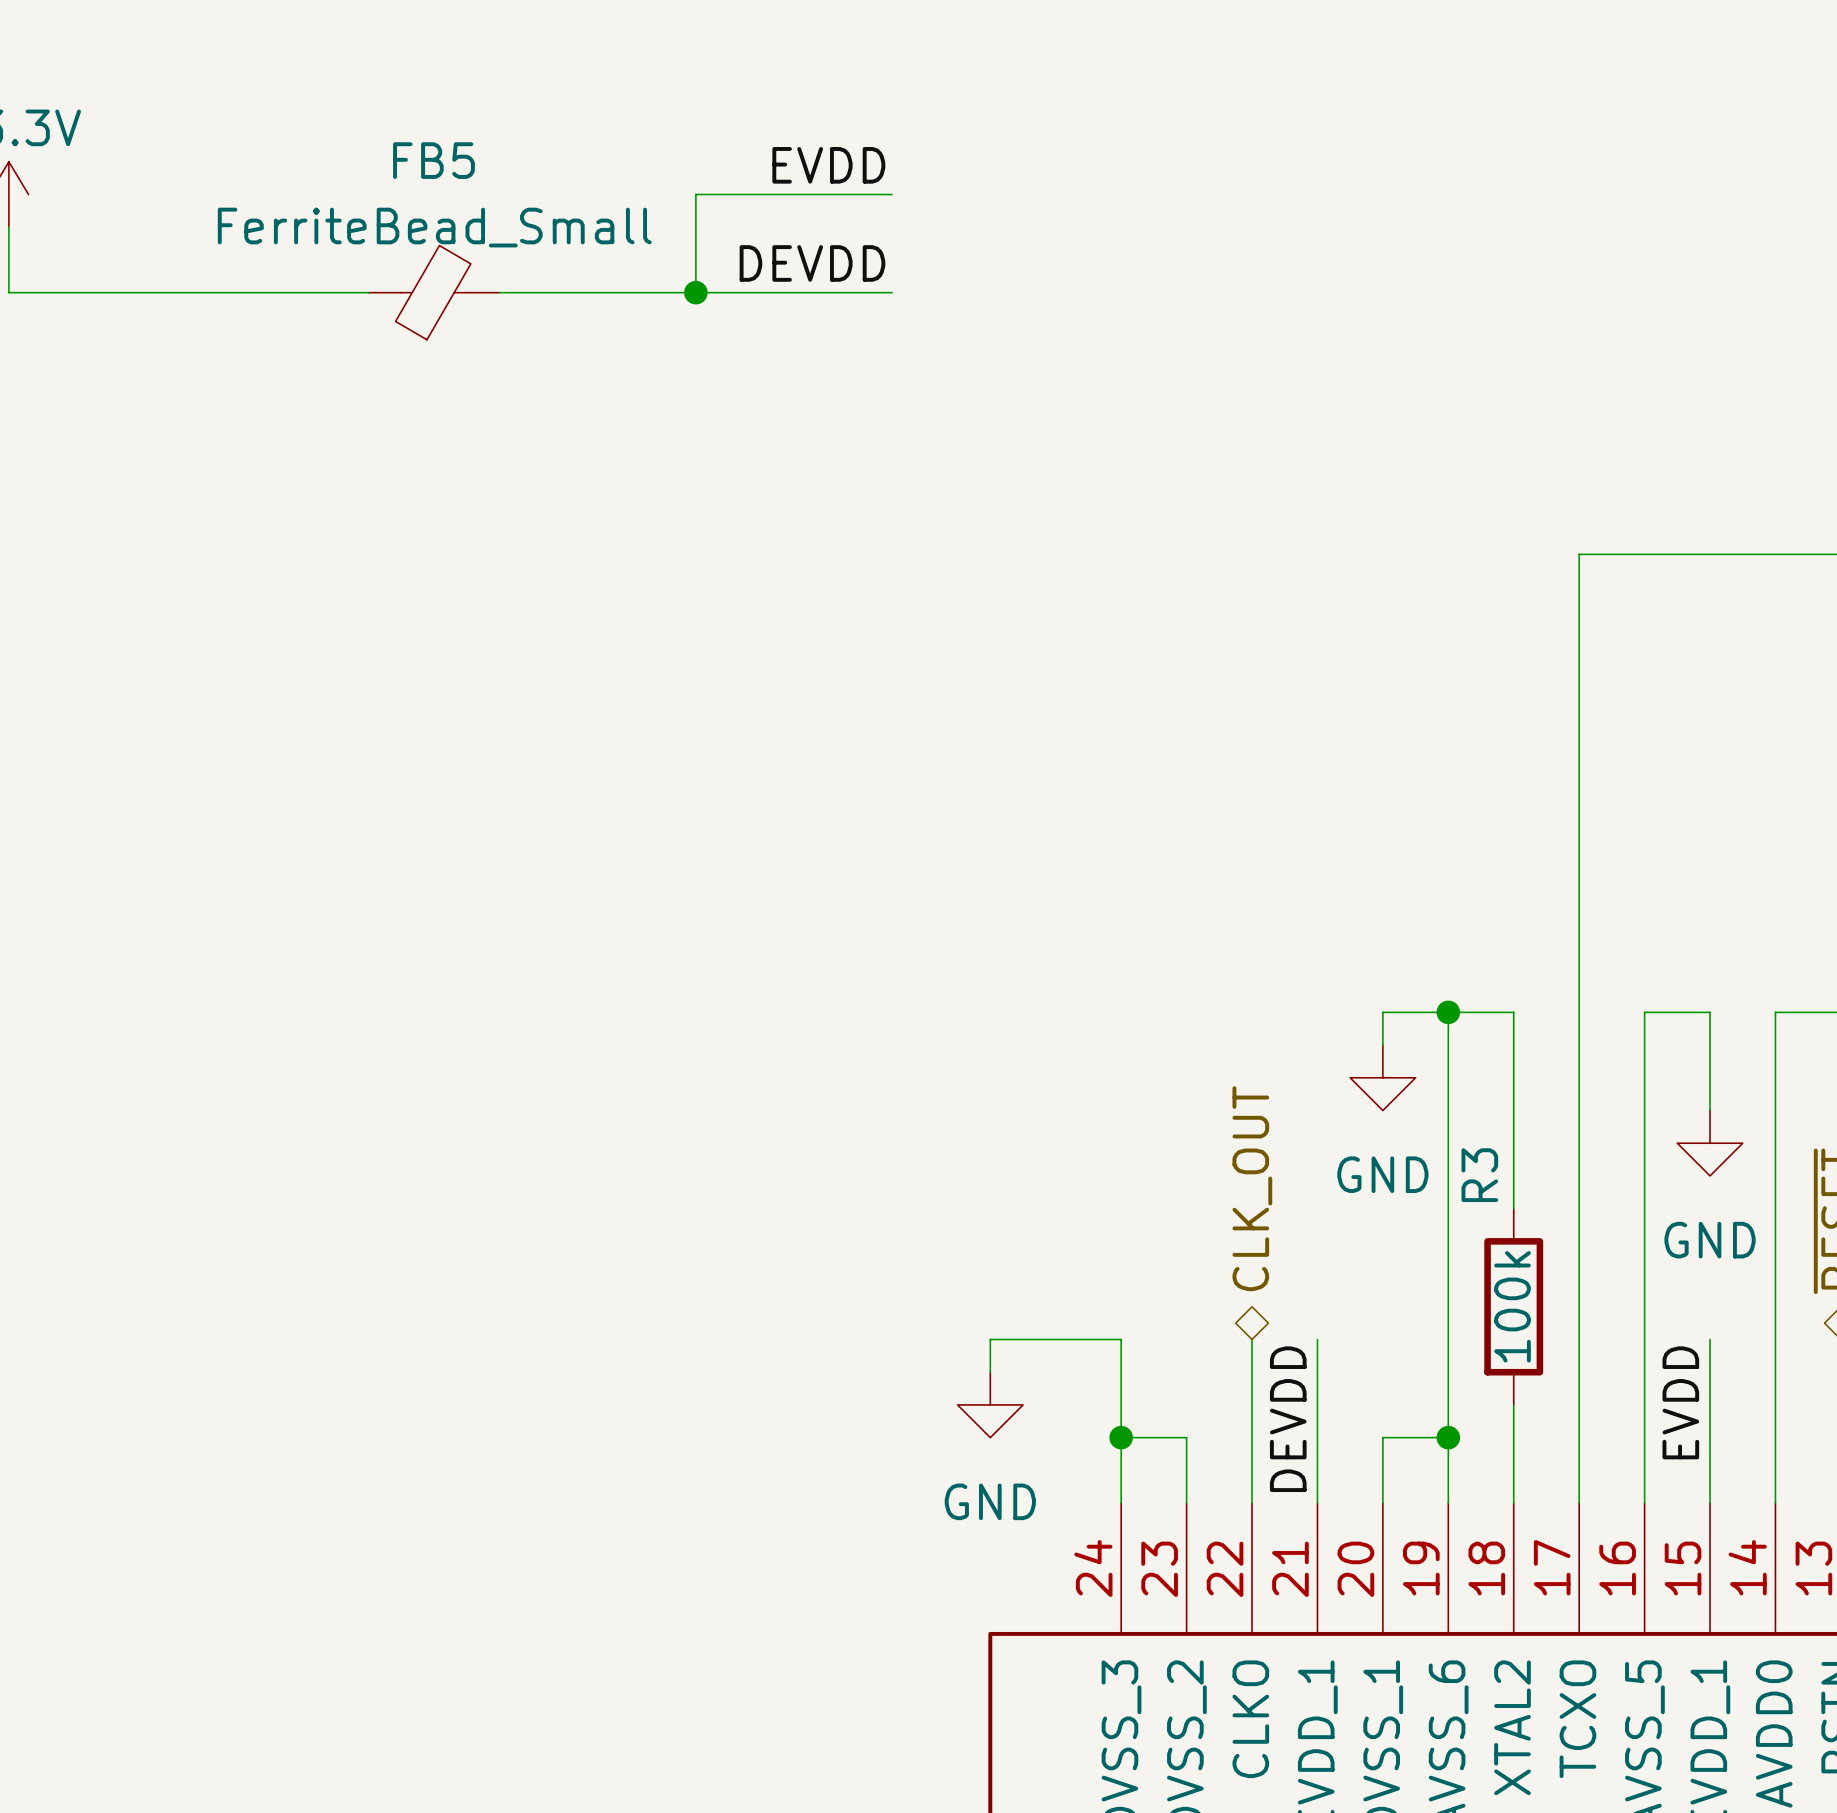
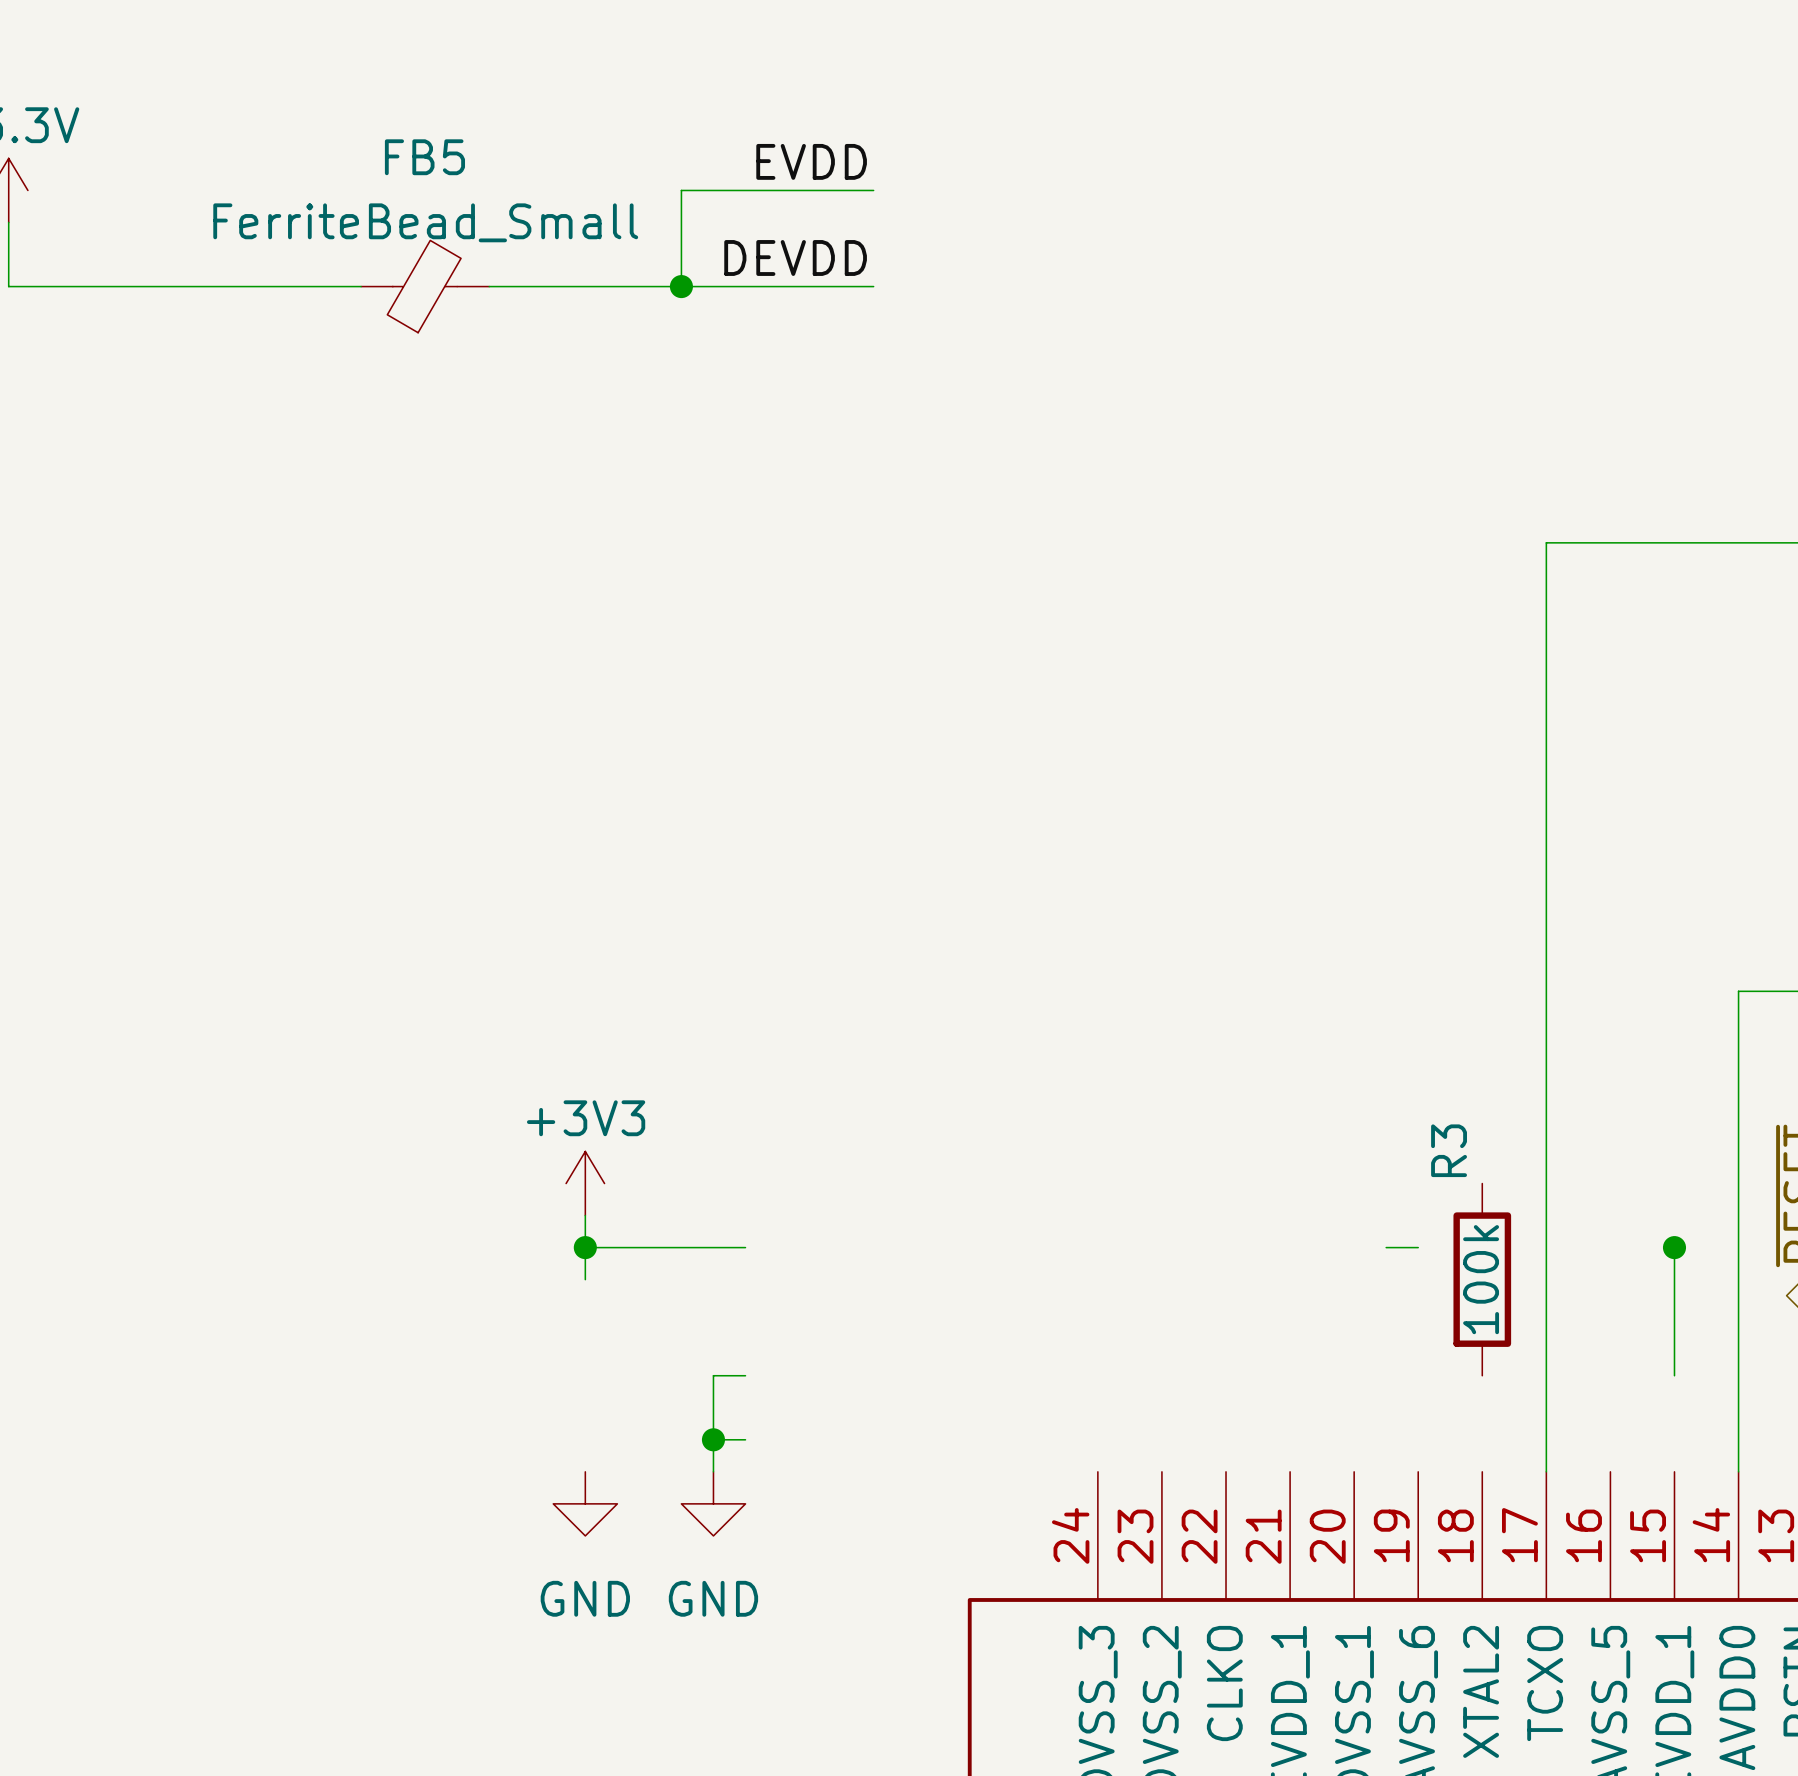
wire: (1448, 1012) (1448, 1503) -> none
junction: (1448, 1012) -> none
wire: (1382, 1045) (1382, 1012) (1513, 1012) (1513, 1208) -> none
power symbol: GND (1382, 1077) -> none
wire: (1710, 1110) (1710, 1012) (1644, 1012) (1644, 1503) -> none
power symbol: GND (1710, 1143) -> none
hierarchical label: CLK_OUT (1252, 1188) -> none
power symbol: none -> +3V3 (585, 1183)
wire: none -> (585, 1215) (585, 1279)
wire: none -> (585, 1247) (745, 1247)
junction: none -> (585, 1247)
wire: none -> (1386, 1247) (1418, 1247)
wire: none -> (1674, 1247) (1674, 1311)
junction: none -> (1674, 1247)
wire: (1252, 1339) (1252, 1503) -> none
wire: (1317, 1339) (1317, 1503) -> none
wire: (990, 1372) (990, 1339) (1121, 1339) (1121, 1503) -> none
label: EVDD (1680, 1402) -> none
wire: none -> (745, 1375) (713, 1375) (713, 1471)
power symbol: GND (990, 1404) -> none
wire: (1513, 1404) (1513, 1503) -> none
wire: (1710, 1404) (1710, 1503) -> none
label: DEVDD (1288, 1419) -> none
wire: (1121, 1437) (1186, 1437) (1186, 1503) -> none
junction: (1121, 1437) -> none
wire: (1448, 1437) (1382, 1437) (1382, 1503) -> none
junction: (1448, 1437) -> none
wire: none -> (713, 1439) (745, 1439)
junction: none -> (713, 1439)
power symbol: none -> GND (585, 1503)
power symbol: none -> GND (713, 1503)

